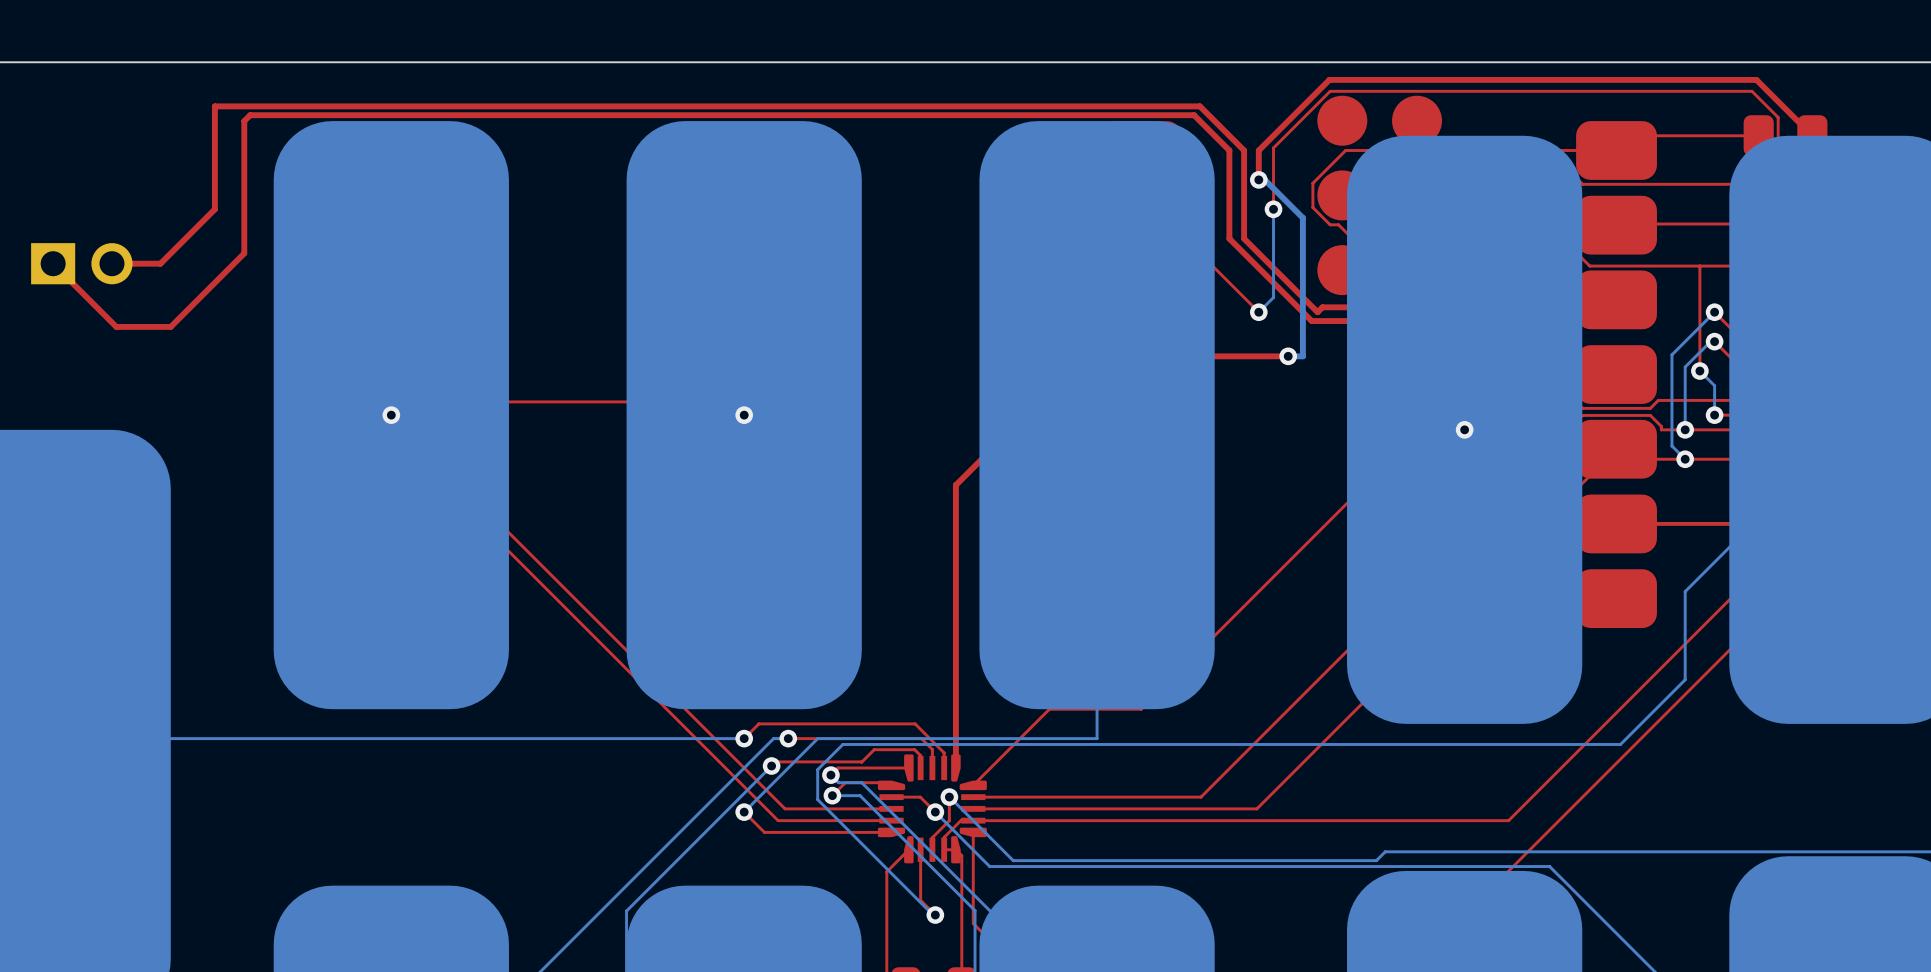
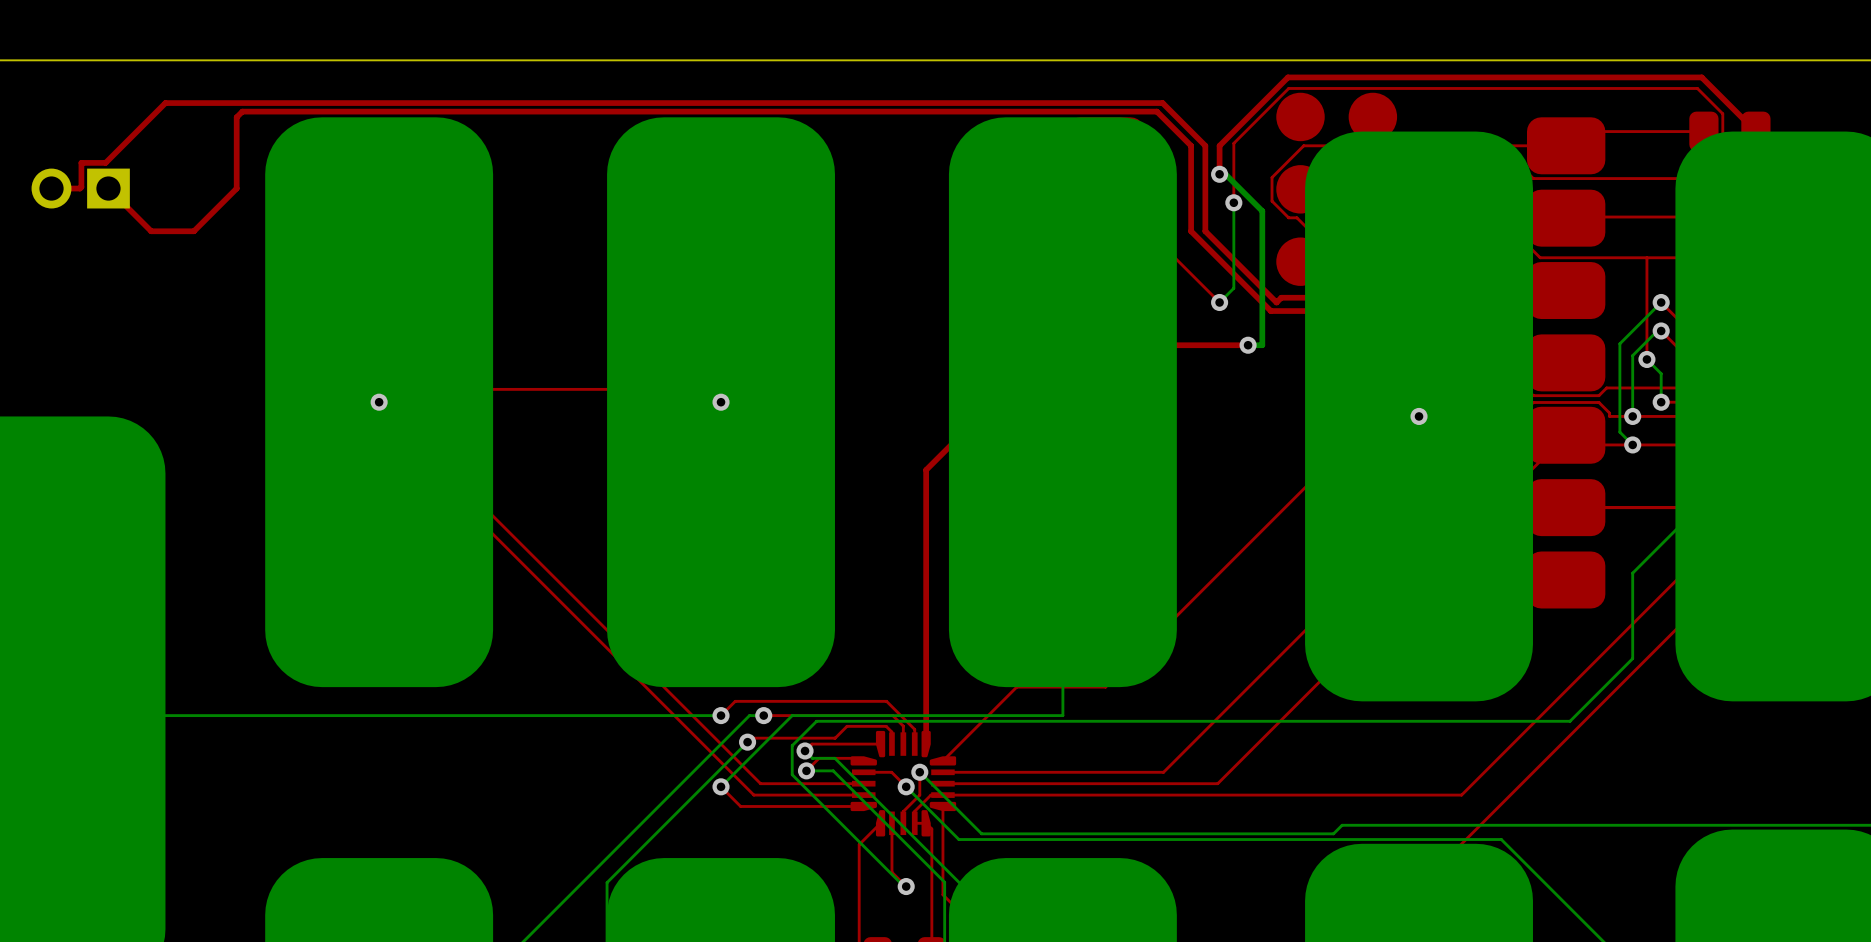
top track: (214, 106) (214, 209) (160, 263) (111, 263) -> (208, 103) (165, 103) (105, 162) (81, 162) (79, 188) (51, 188)
top track: (244, 194) (244, 253) (170, 326) (116, 326) (53, 263) -> (236, 188) (193, 231) (151, 231) (108, 188)
part rotation: 0° (81, 263) -> 180° (80, 188)
part position: (81, 263) -> (80, 188)

